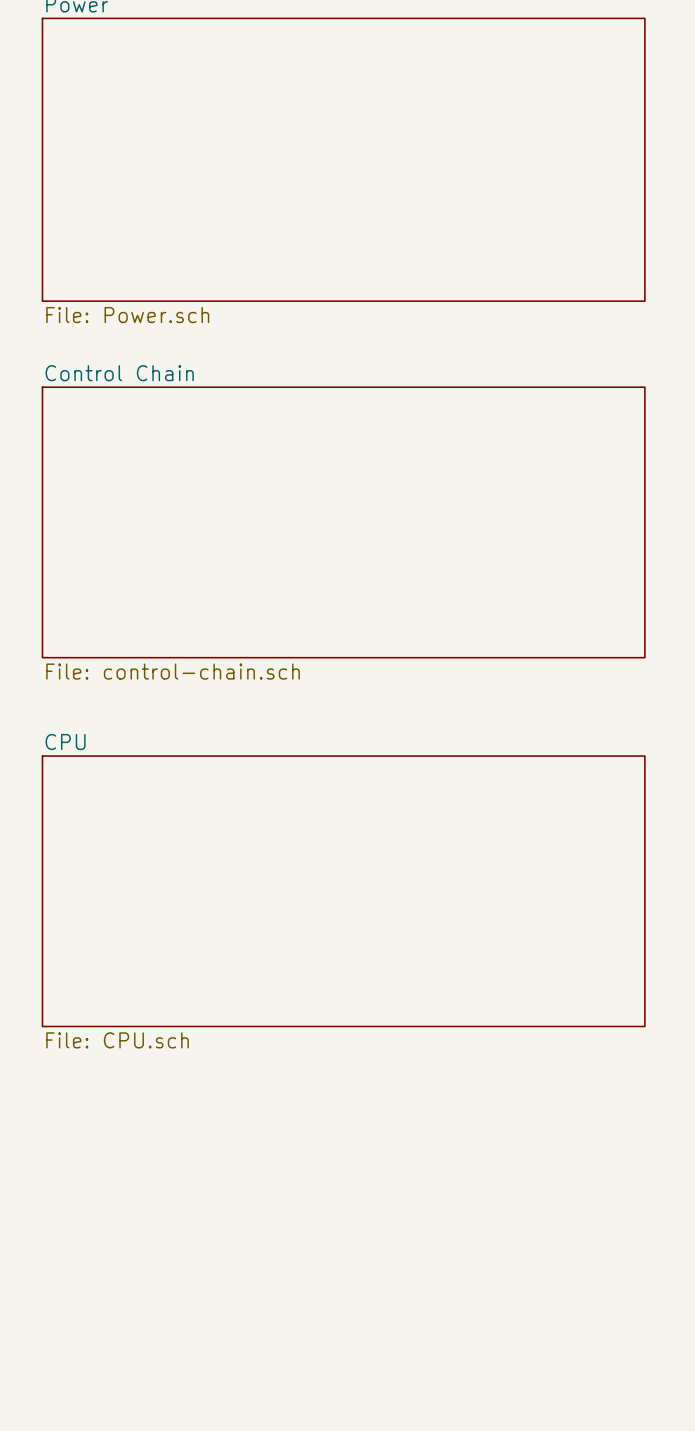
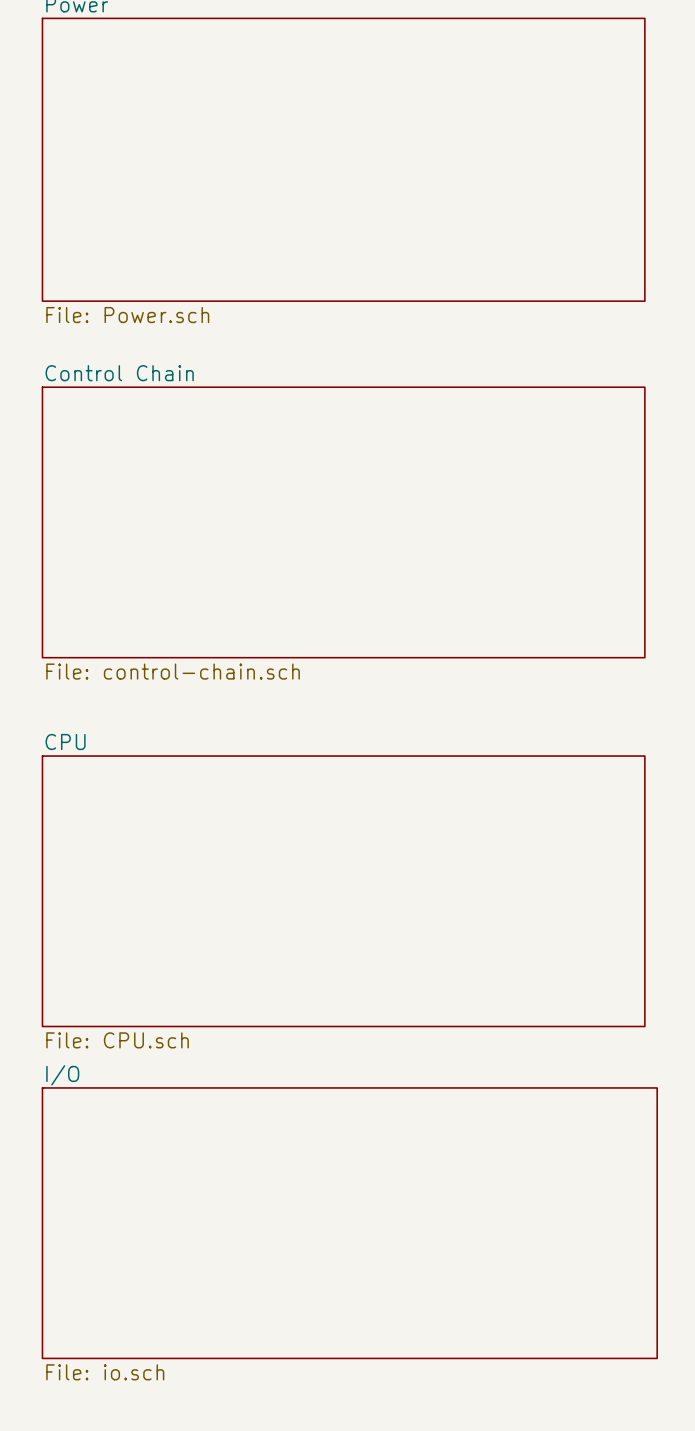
sheet I/O: none -> File: io.sch (349, 1223)

